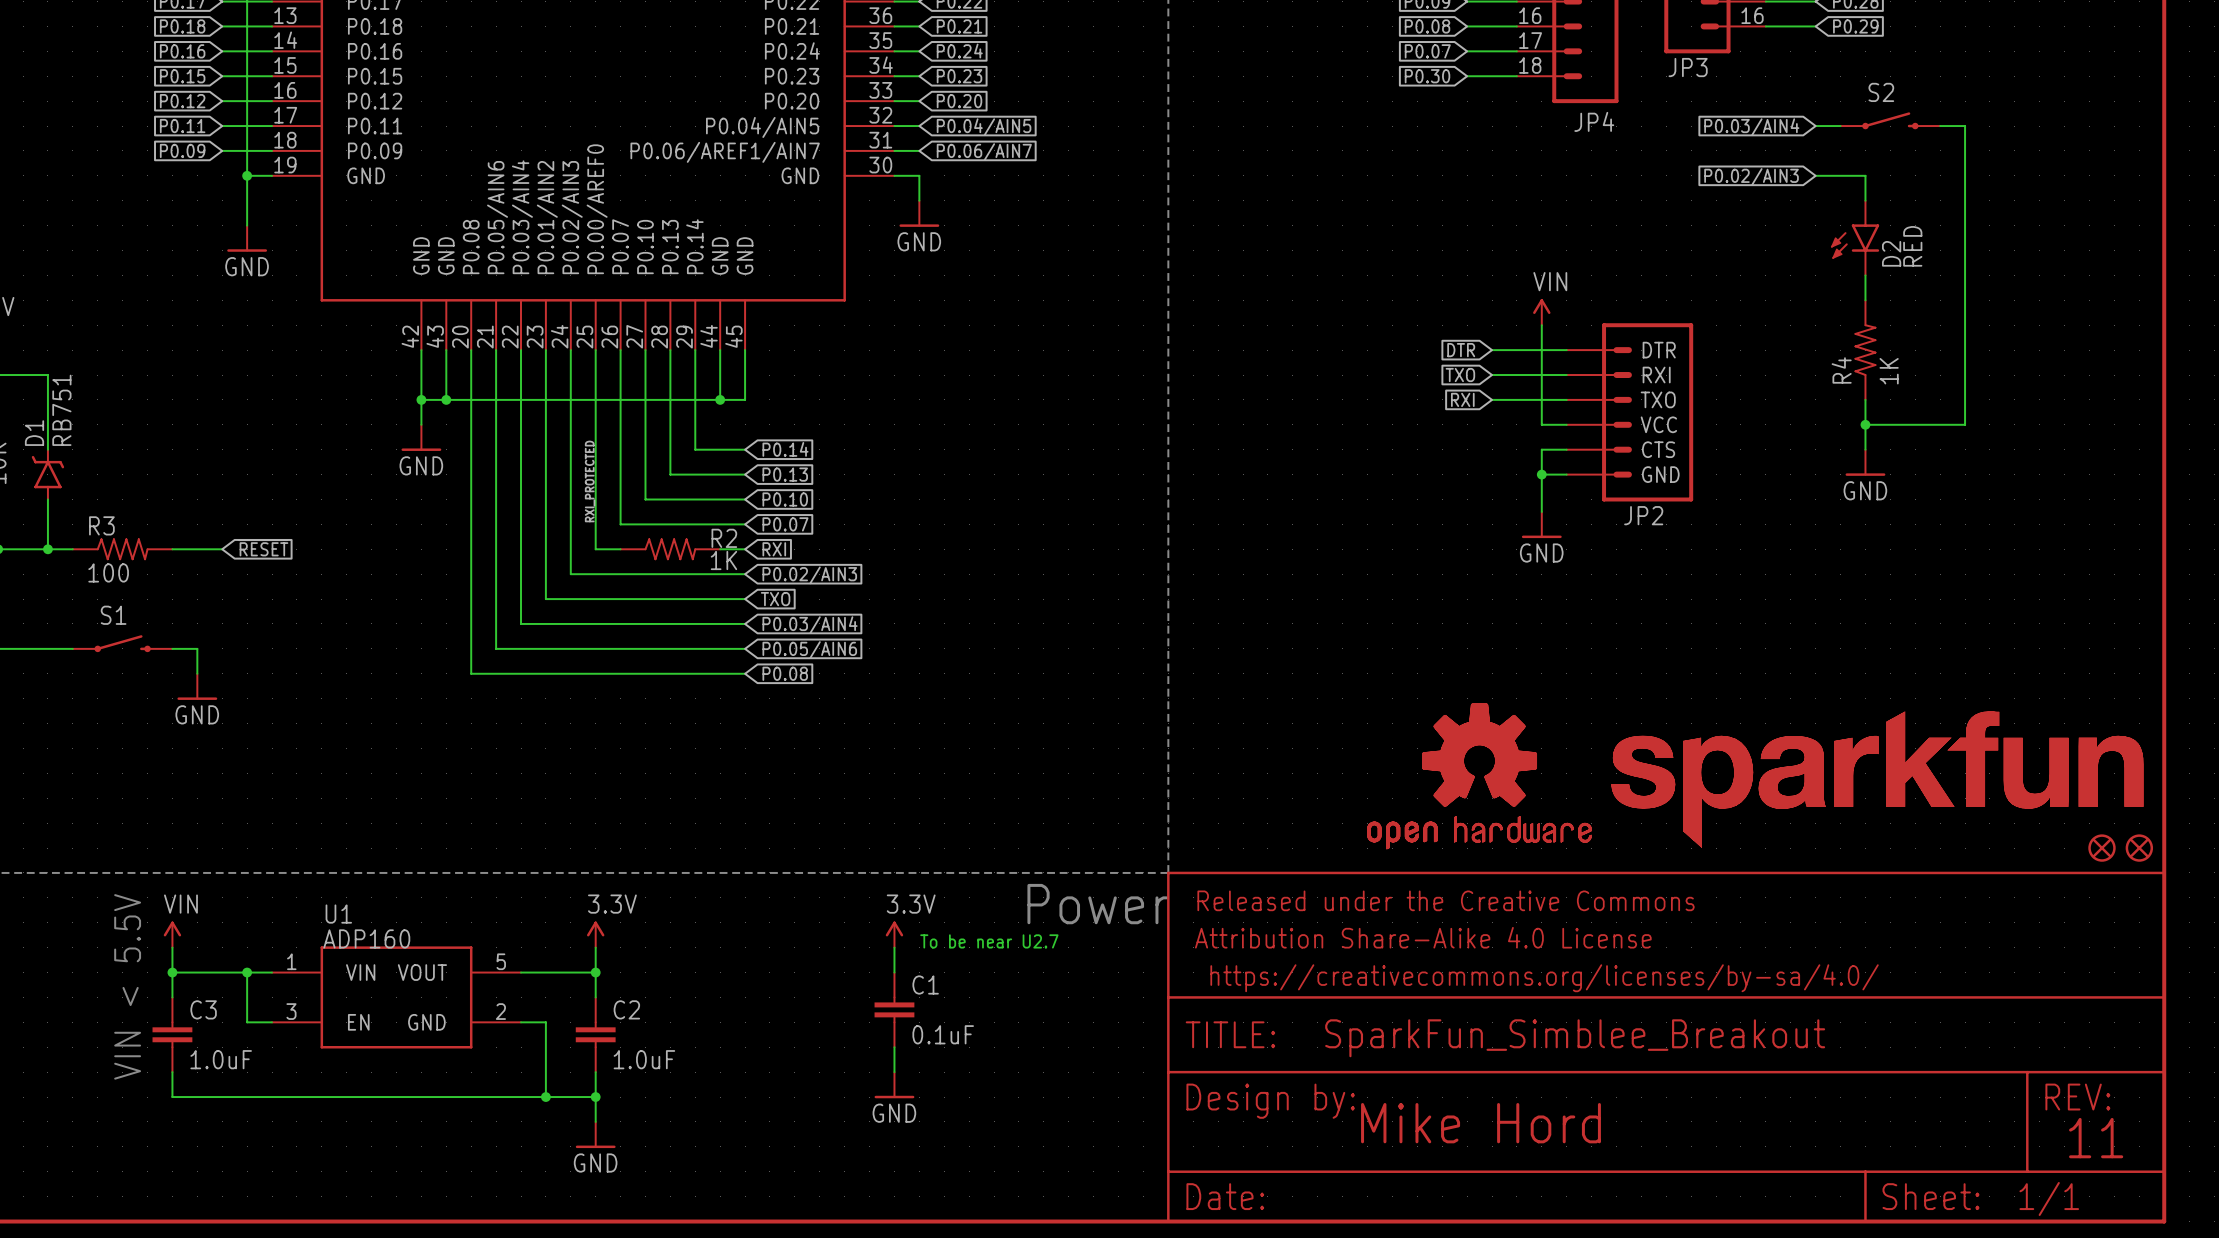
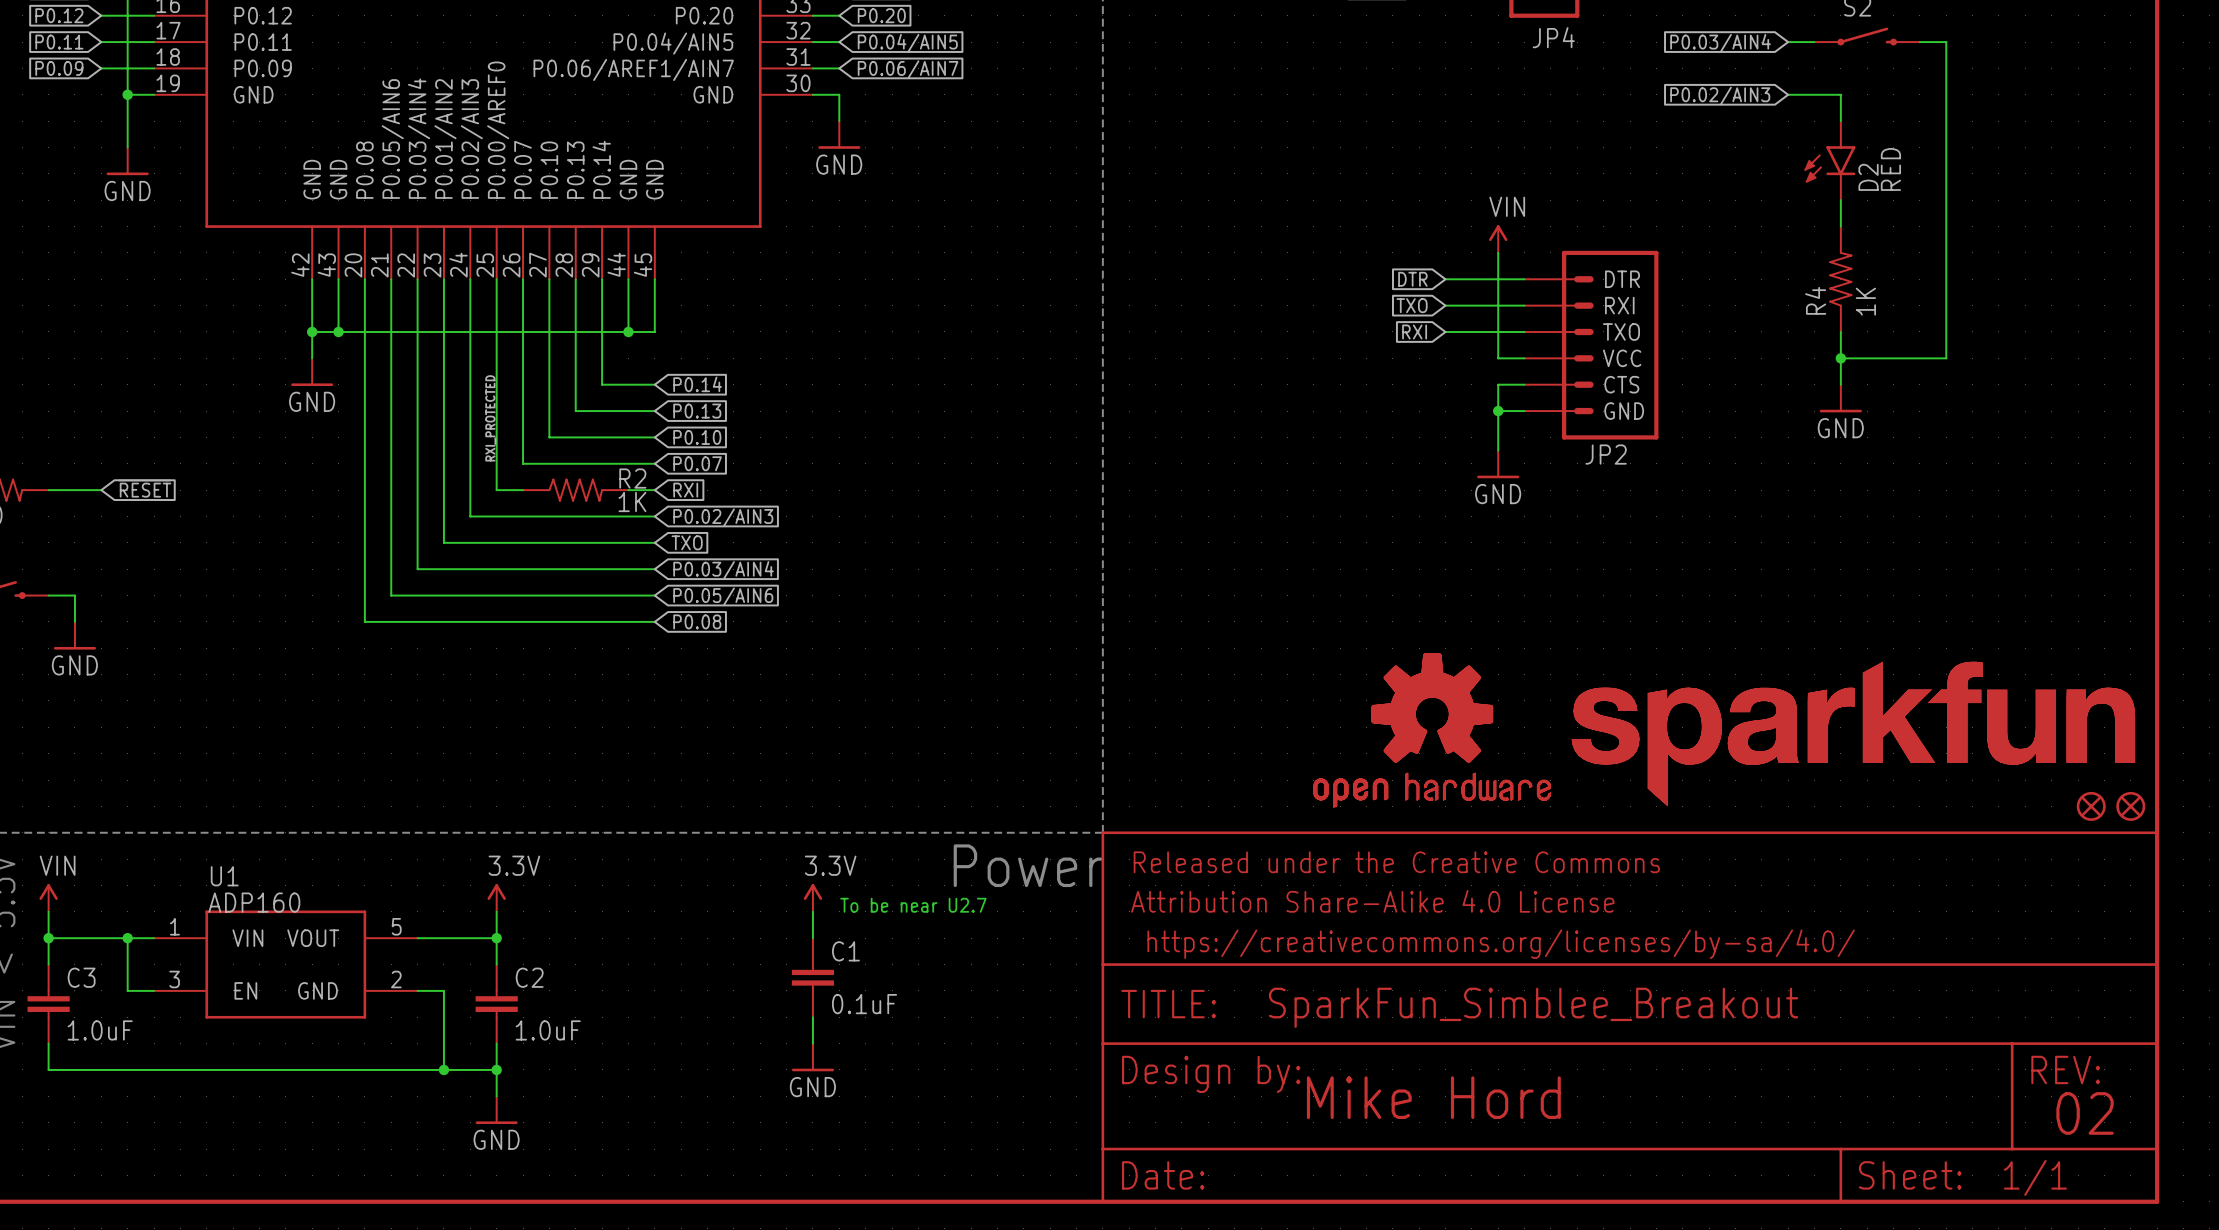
text: 11 (2096, 1138) -> 02 (2085, 1113)

